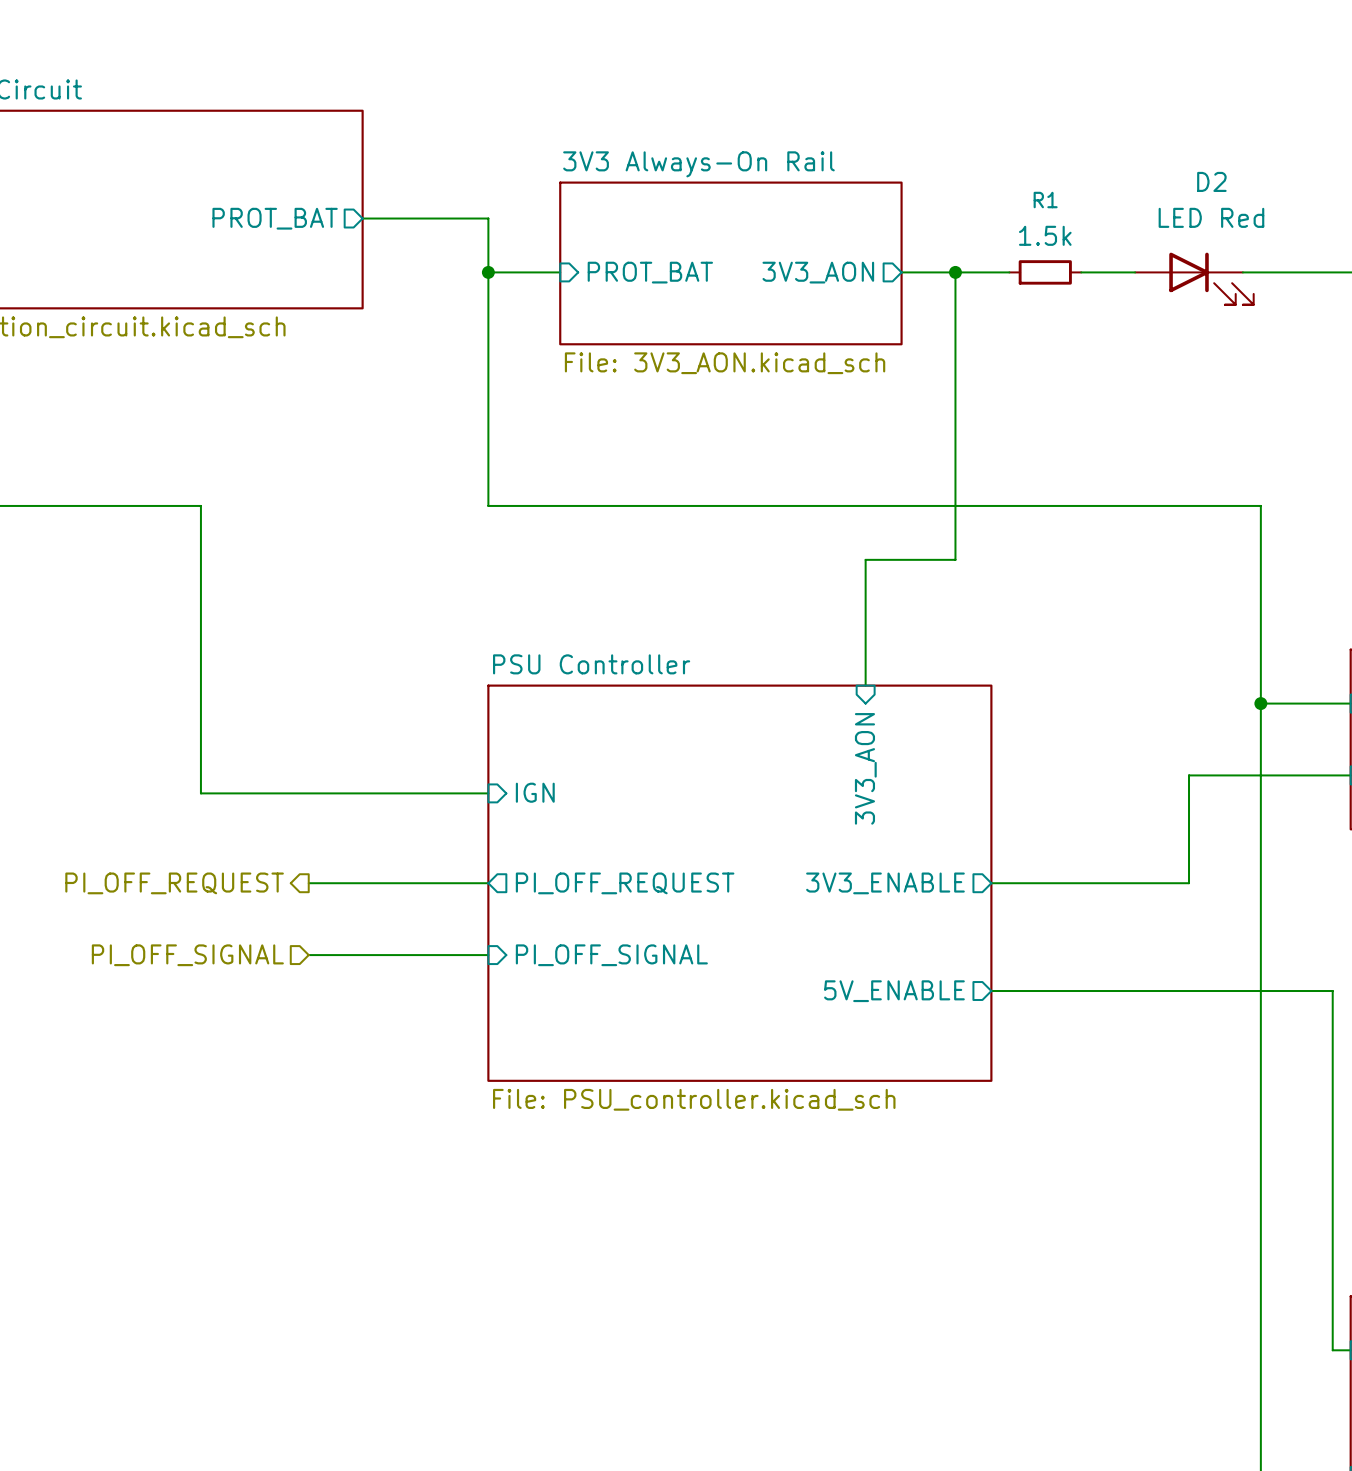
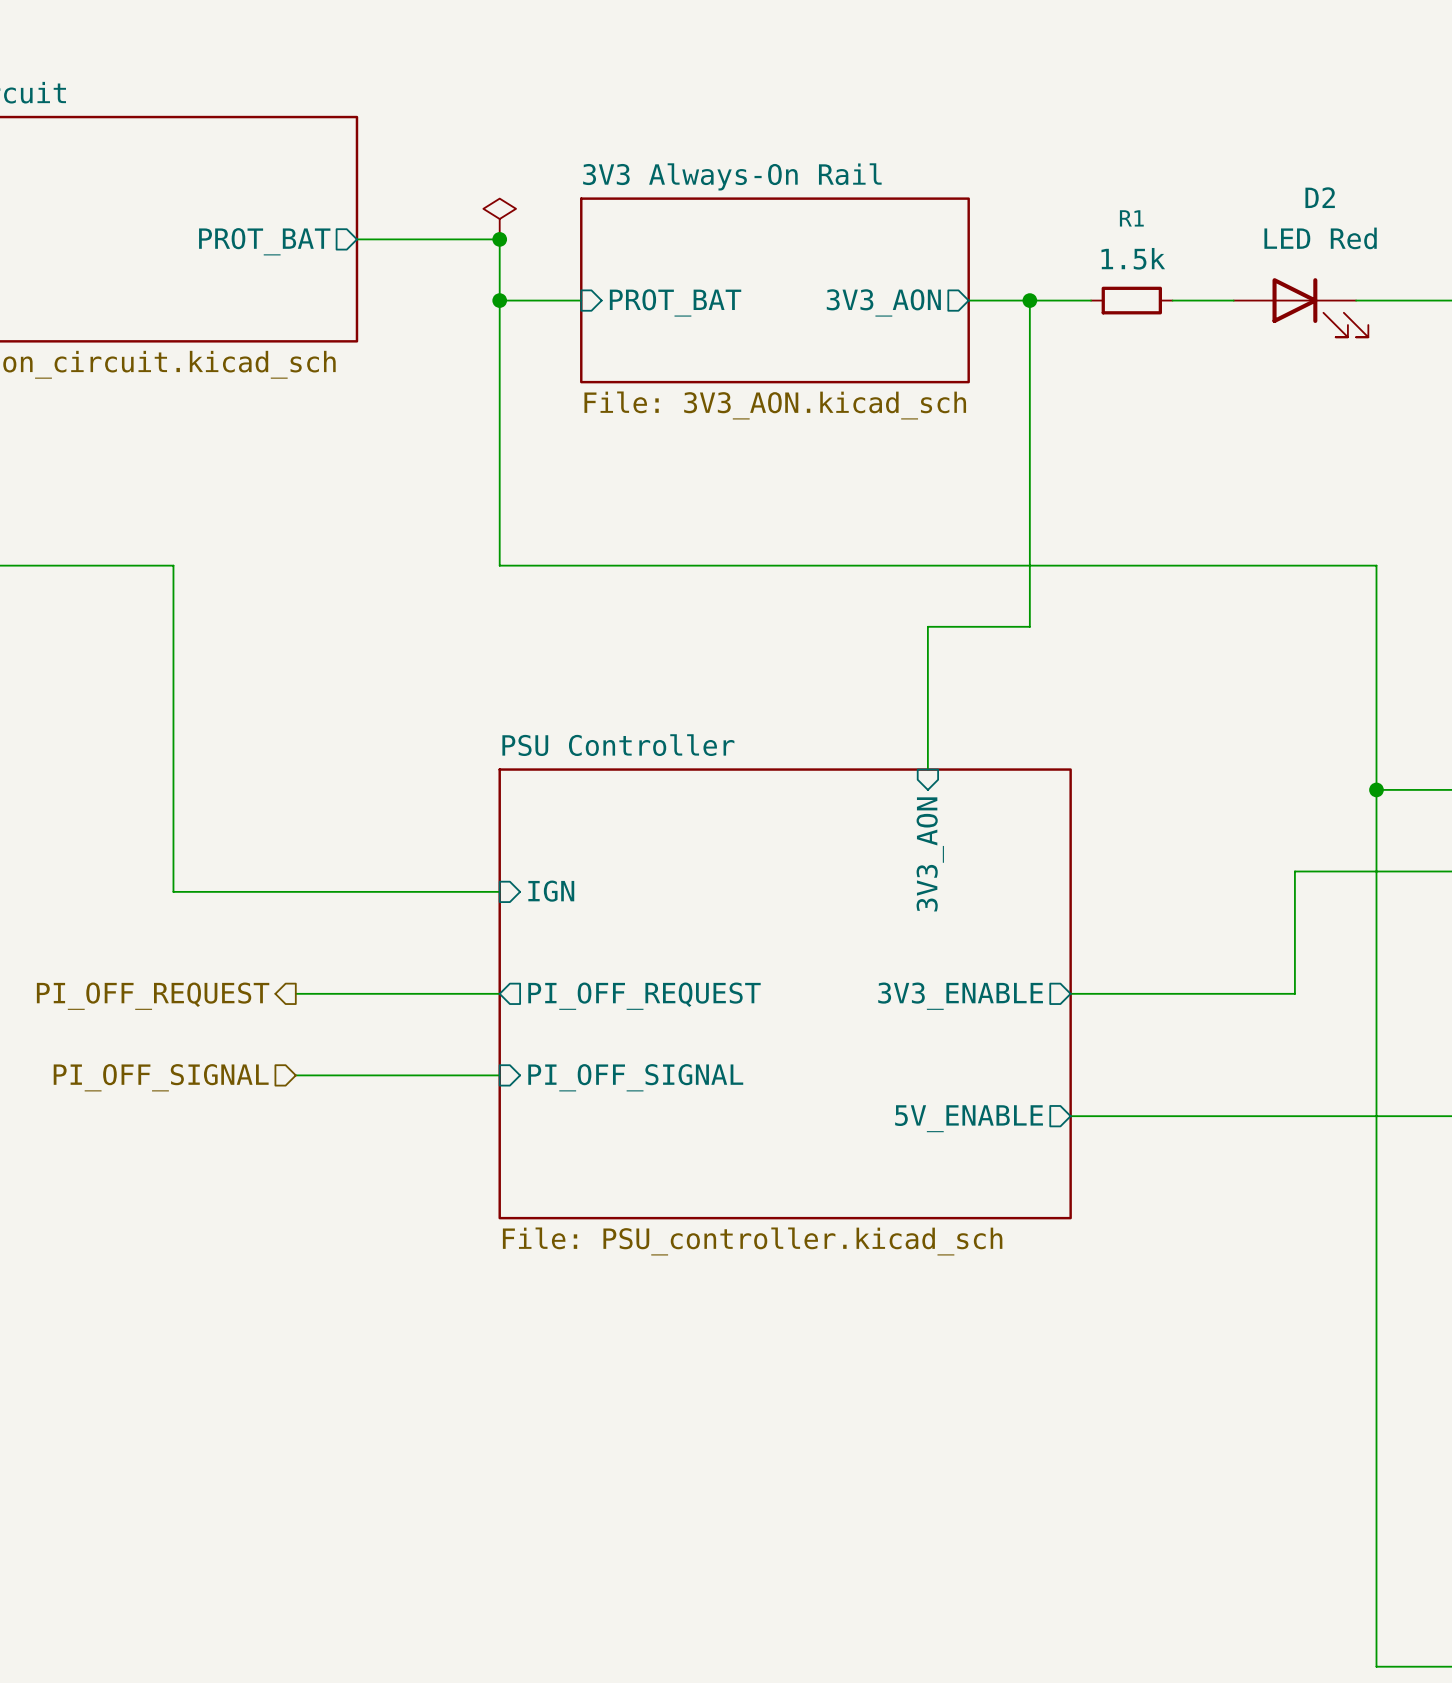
power symbol: none -> (499, 219)
junction: none -> (499, 239)

